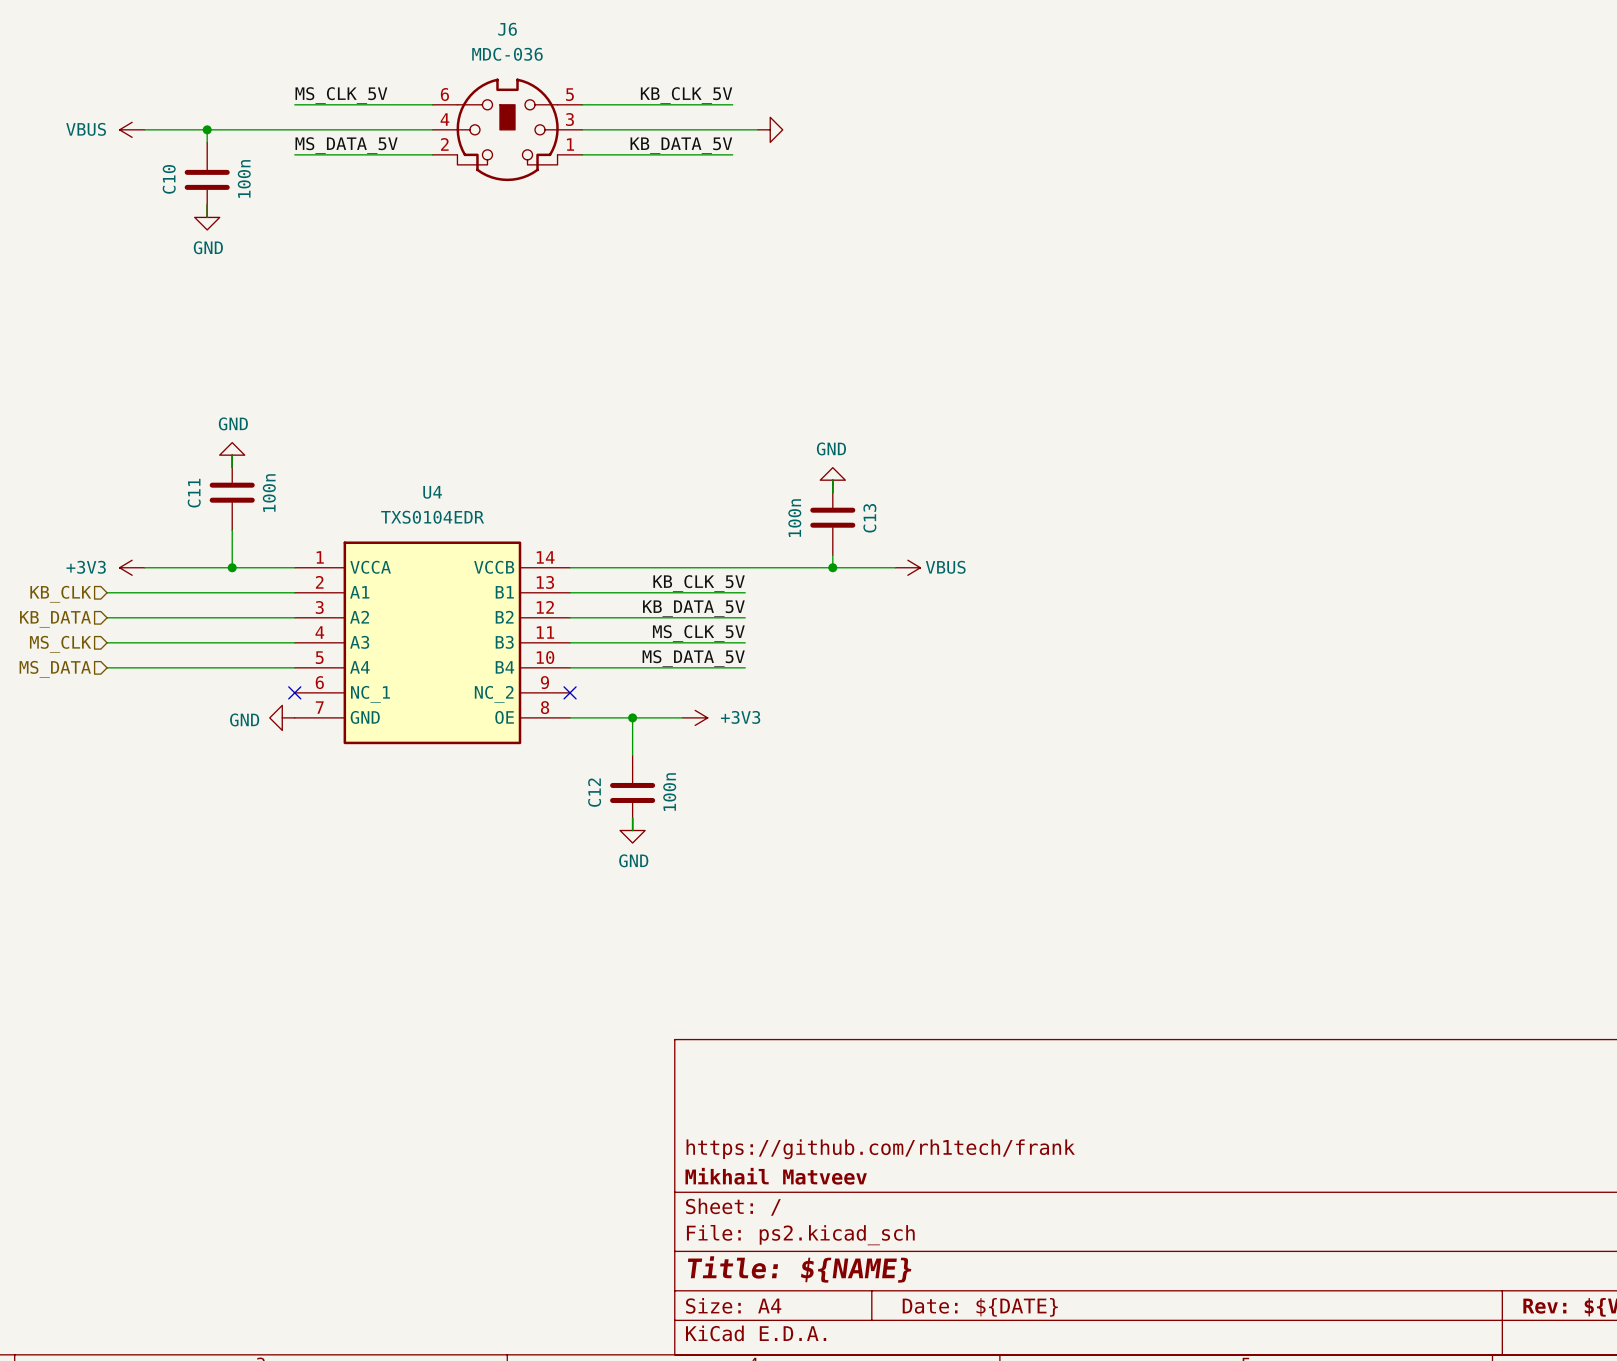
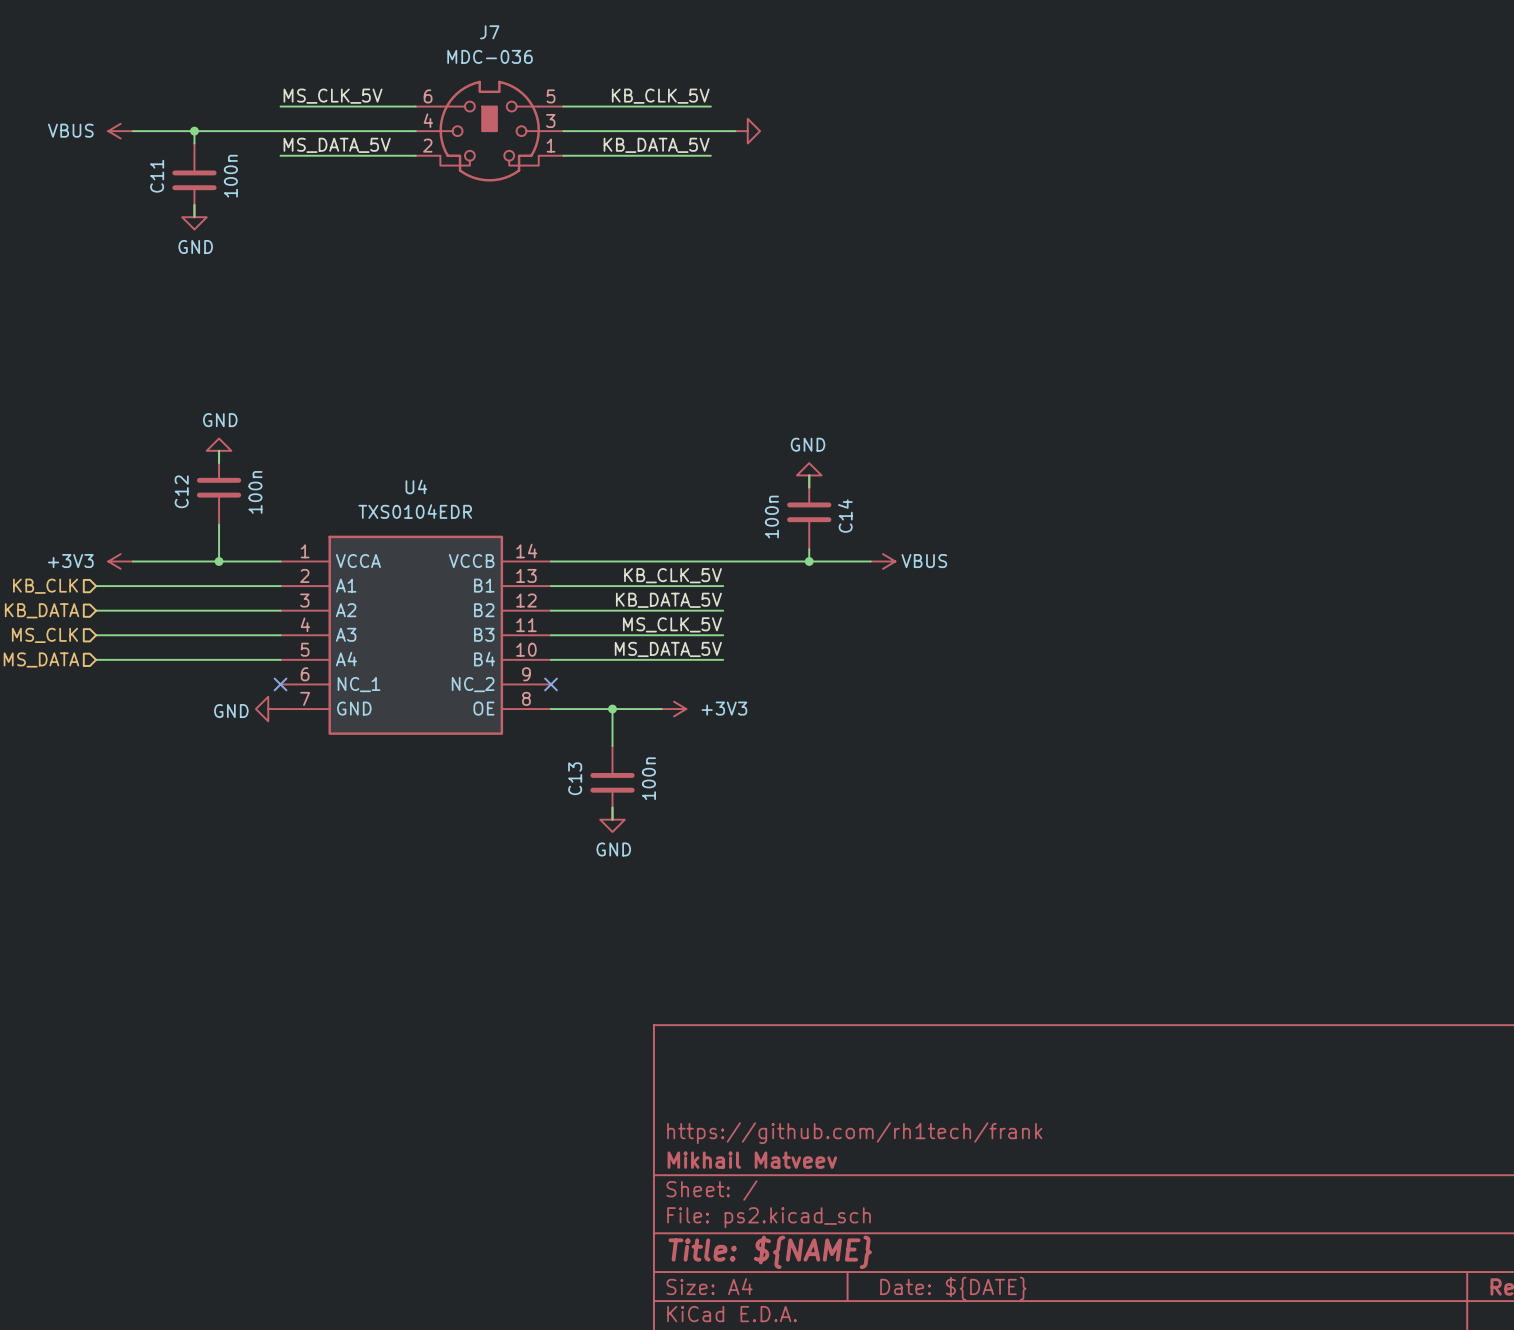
J6 name: J6 (507, 29) -> J7 (489, 32)
C10 name: C10 (169, 179) -> C11 (157, 176)
C11 name: C11 (194, 493) -> C12 (181, 491)
C13 name: C13 (869, 518) -> C14 (845, 516)
C12 name: C12 (594, 792) -> C13 (575, 778)

